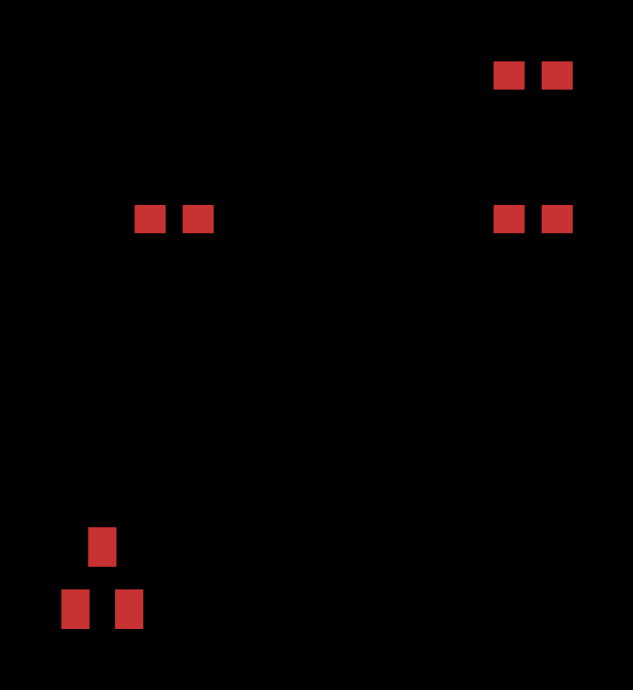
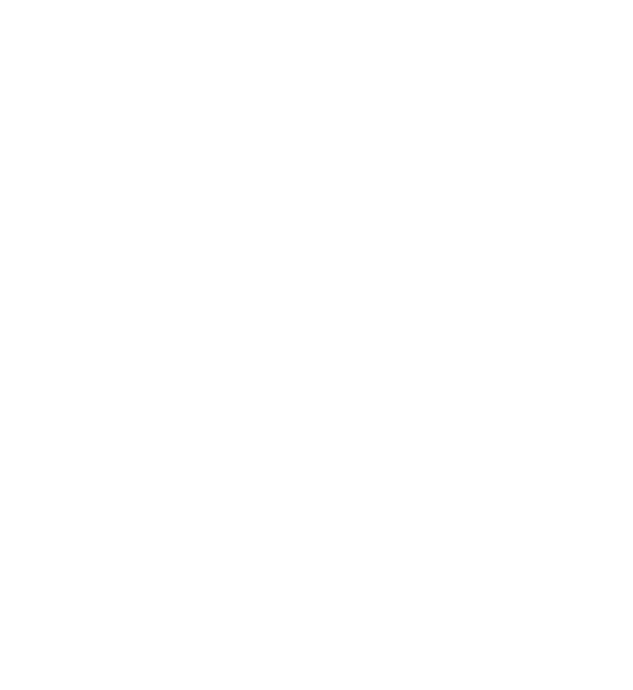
part: (533, 75) -> none
part: (174, 219) -> none
part: (533, 219) -> none
part: (102, 578) -> none

